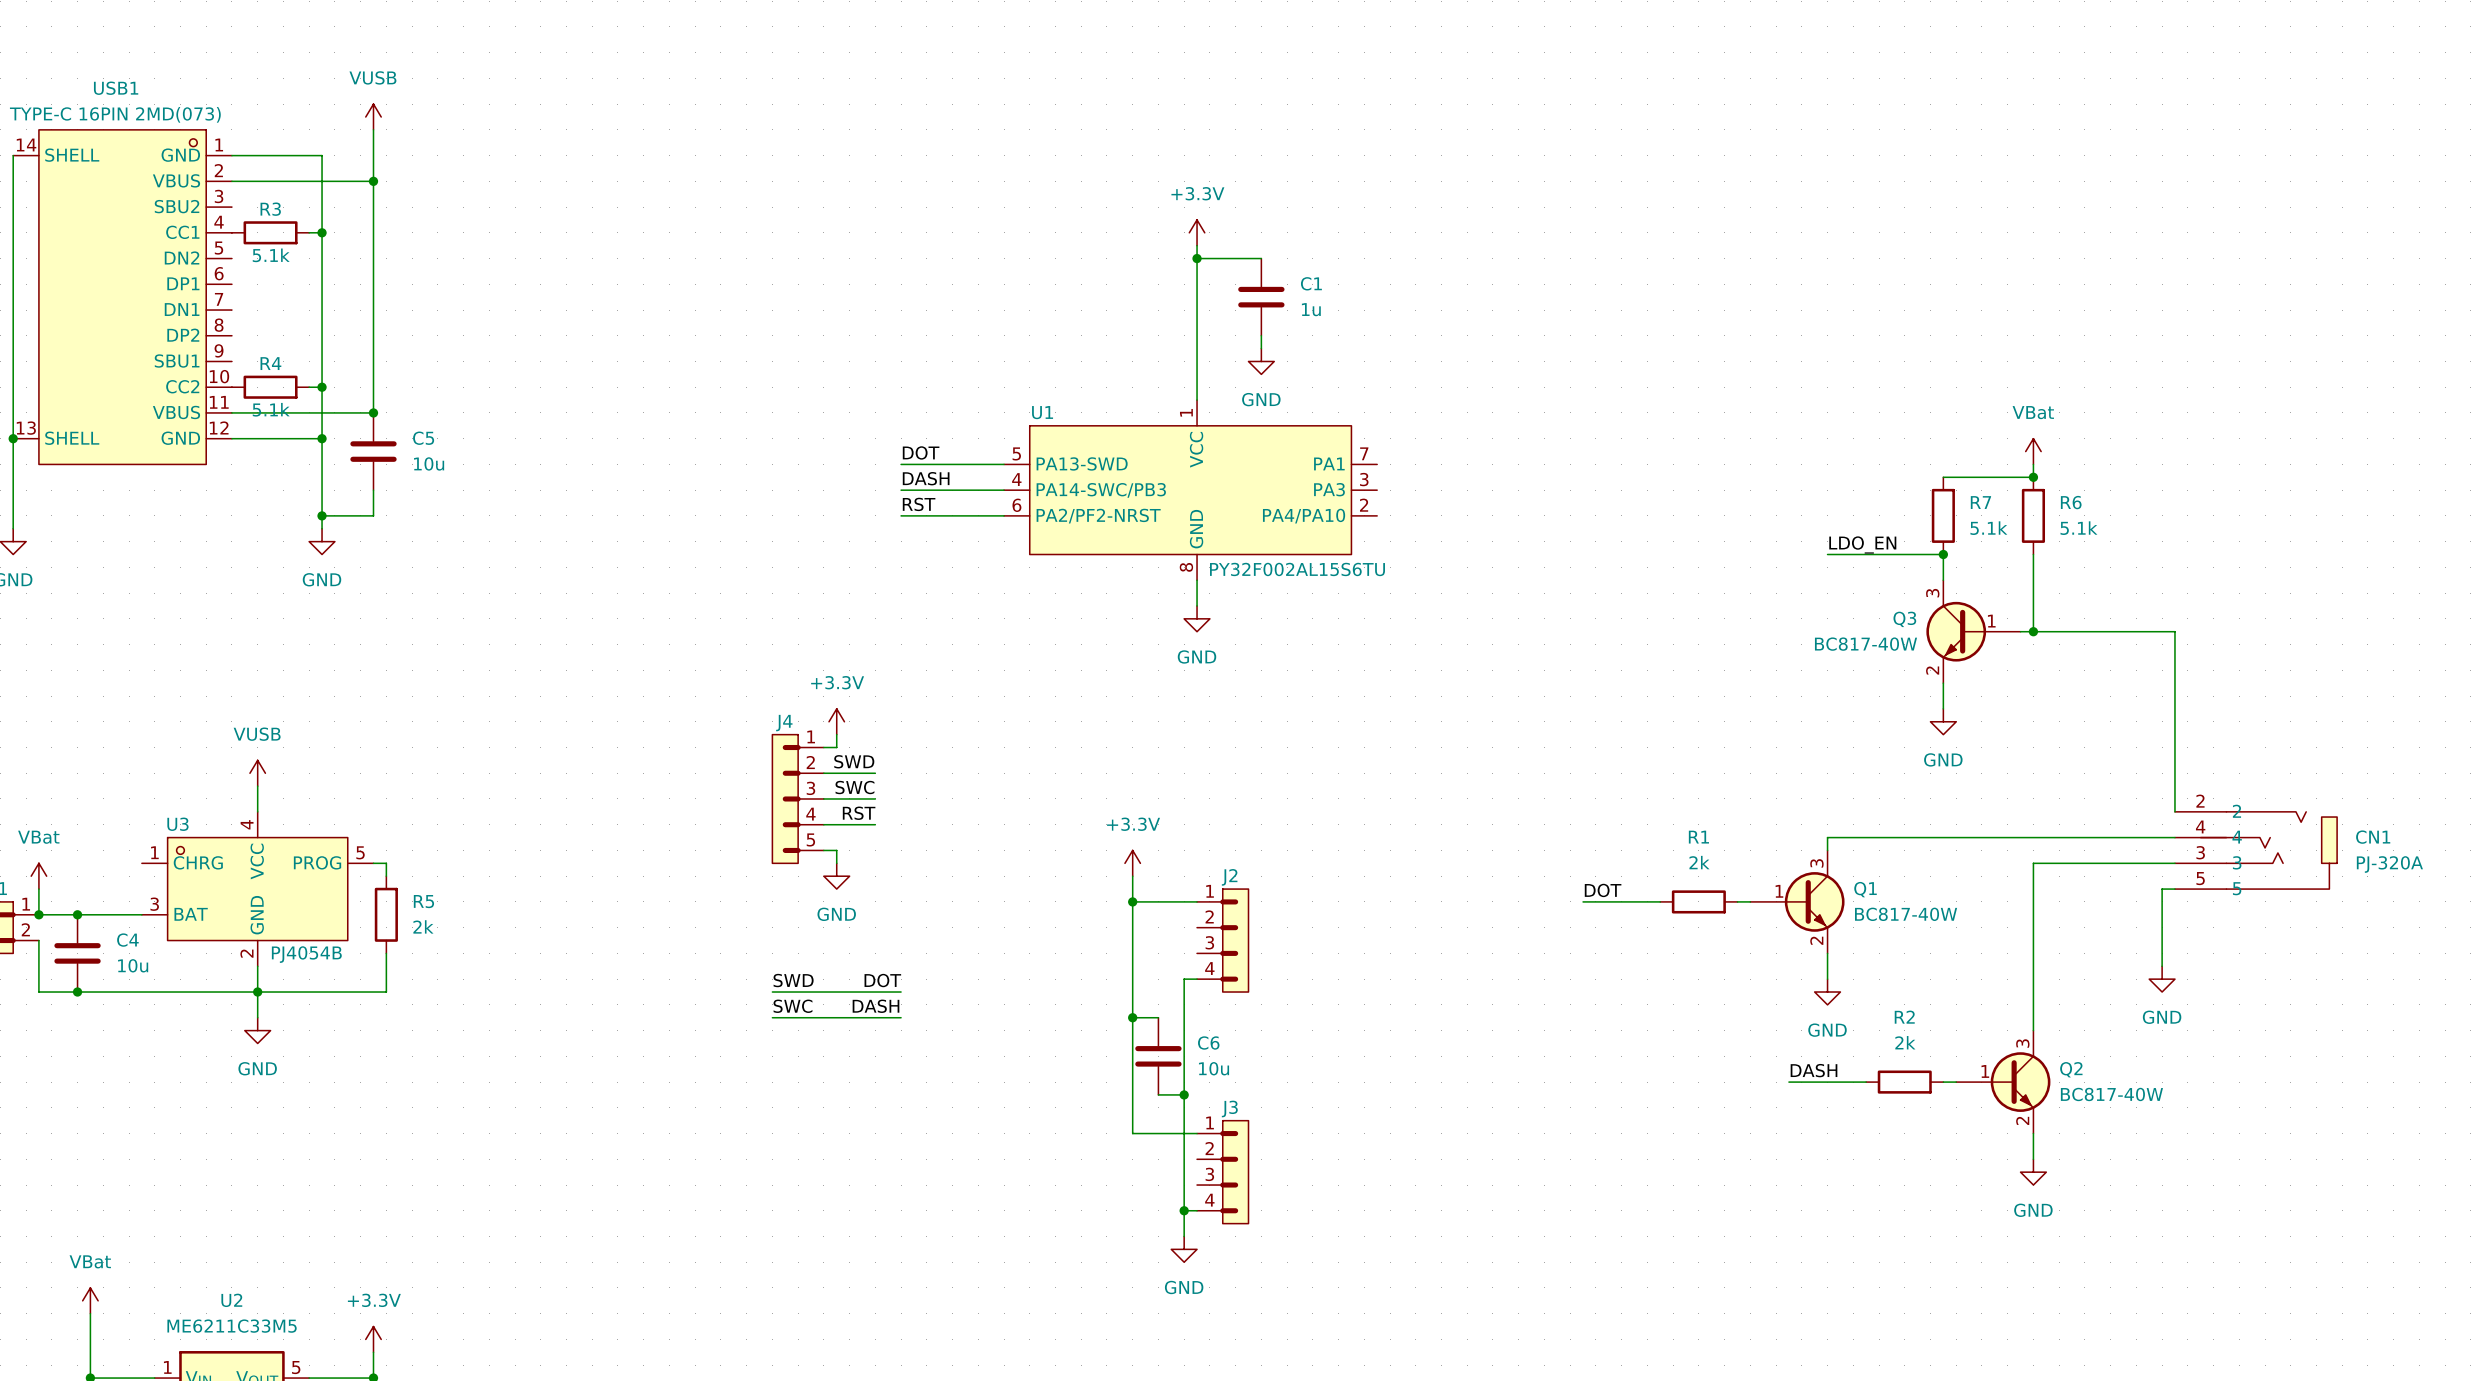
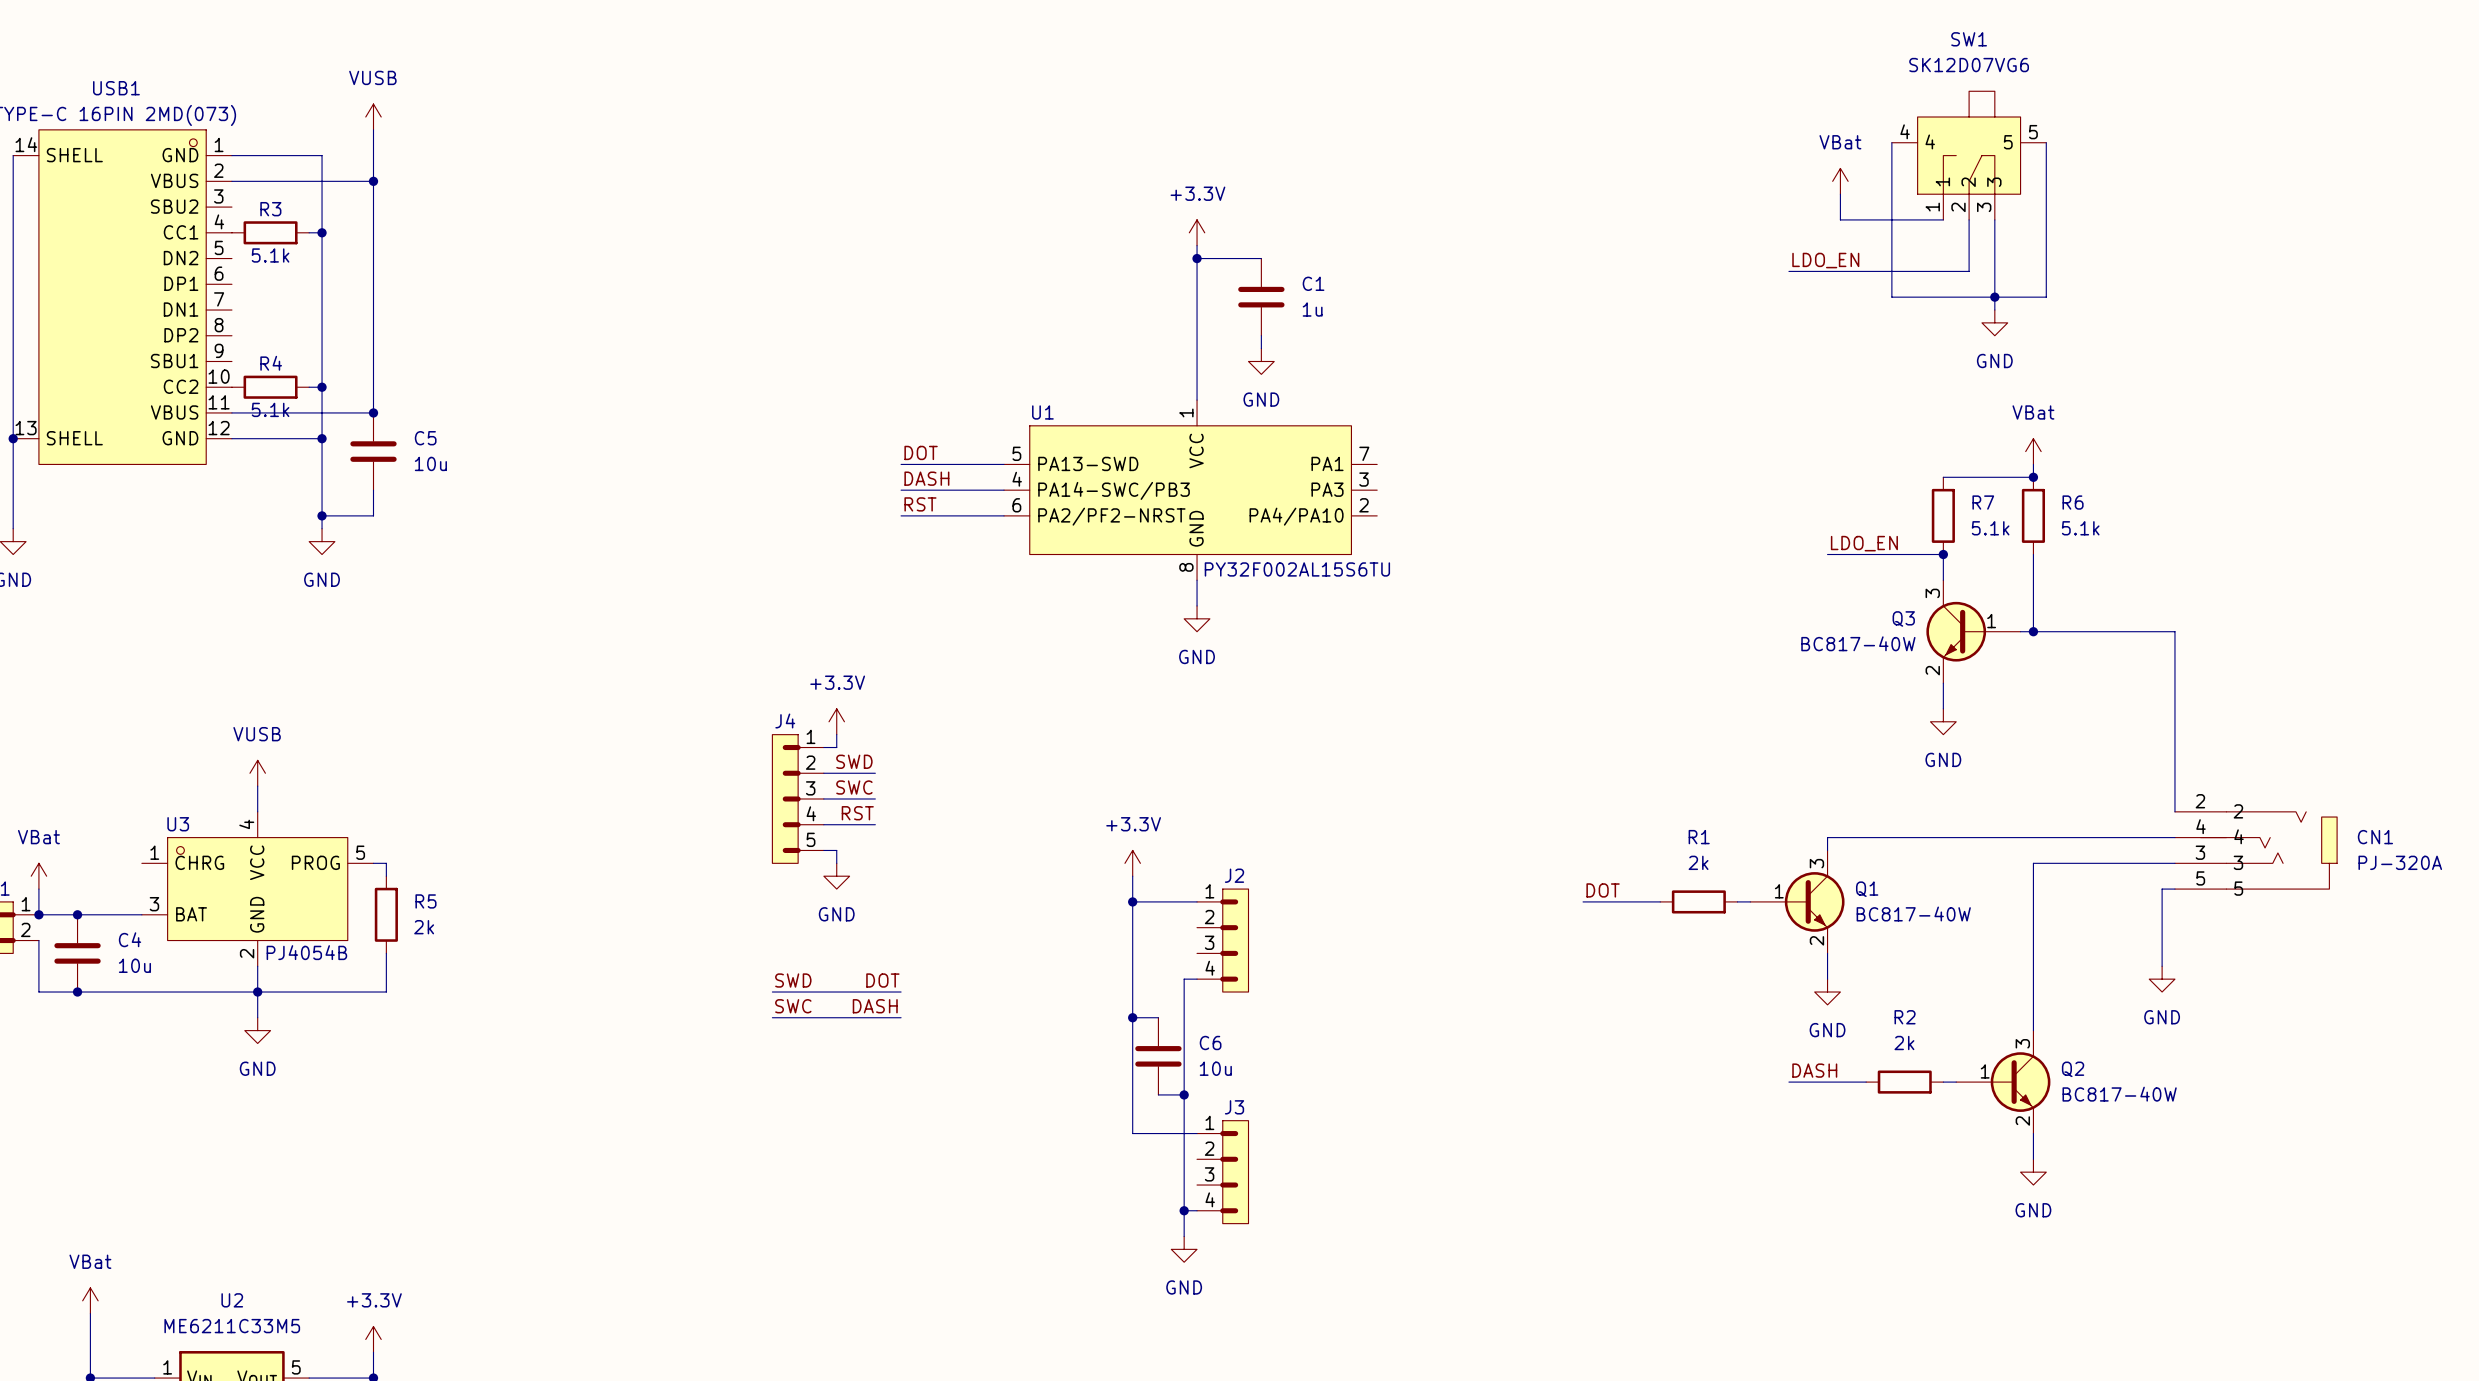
wire: none -> (1891, 142) (1891, 297) (2046, 297) (2046, 142)
SW1: none -> SK12D07VG6 (1969, 155)
power symbol: none -> VBat (1840, 181)
wire: none -> (1840, 194) (1840, 219) (1943, 219)
wire: none -> (1969, 219) (1969, 271) (1788, 271)
wire: none -> (1994, 219) (1994, 310)
label: none -> LDO_EN (1825, 260)
junction: none -> (1994, 297)
power symbol: none -> GND (1994, 322)

